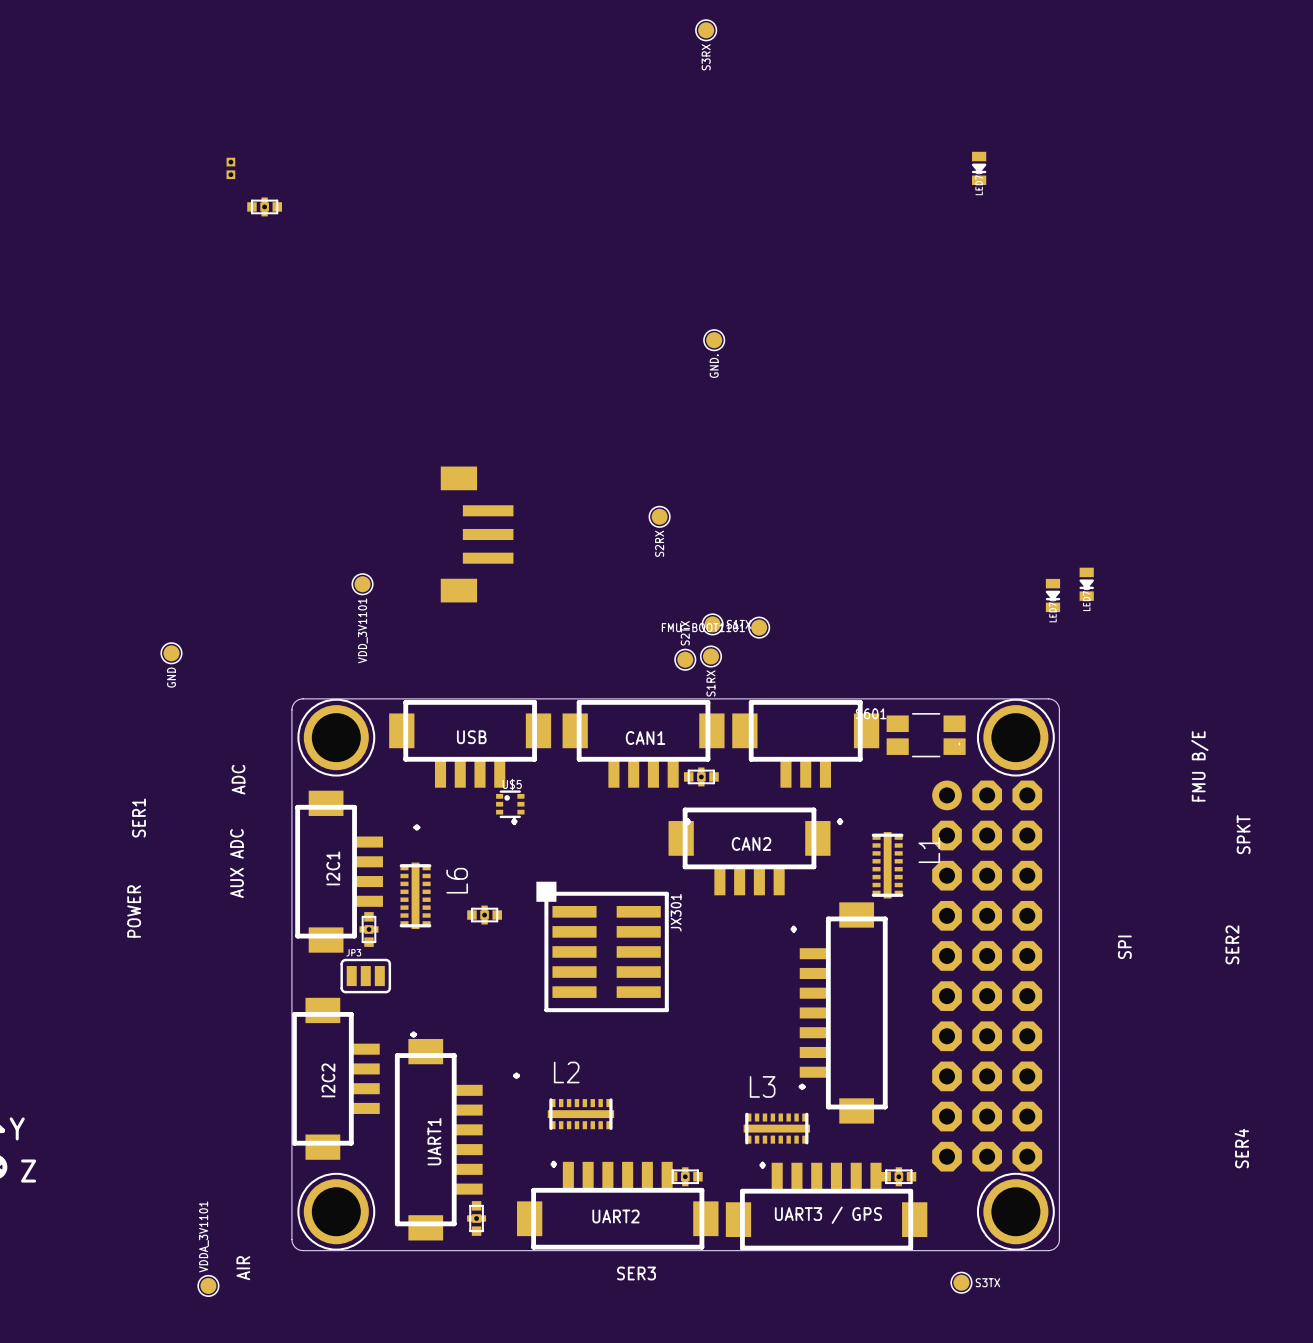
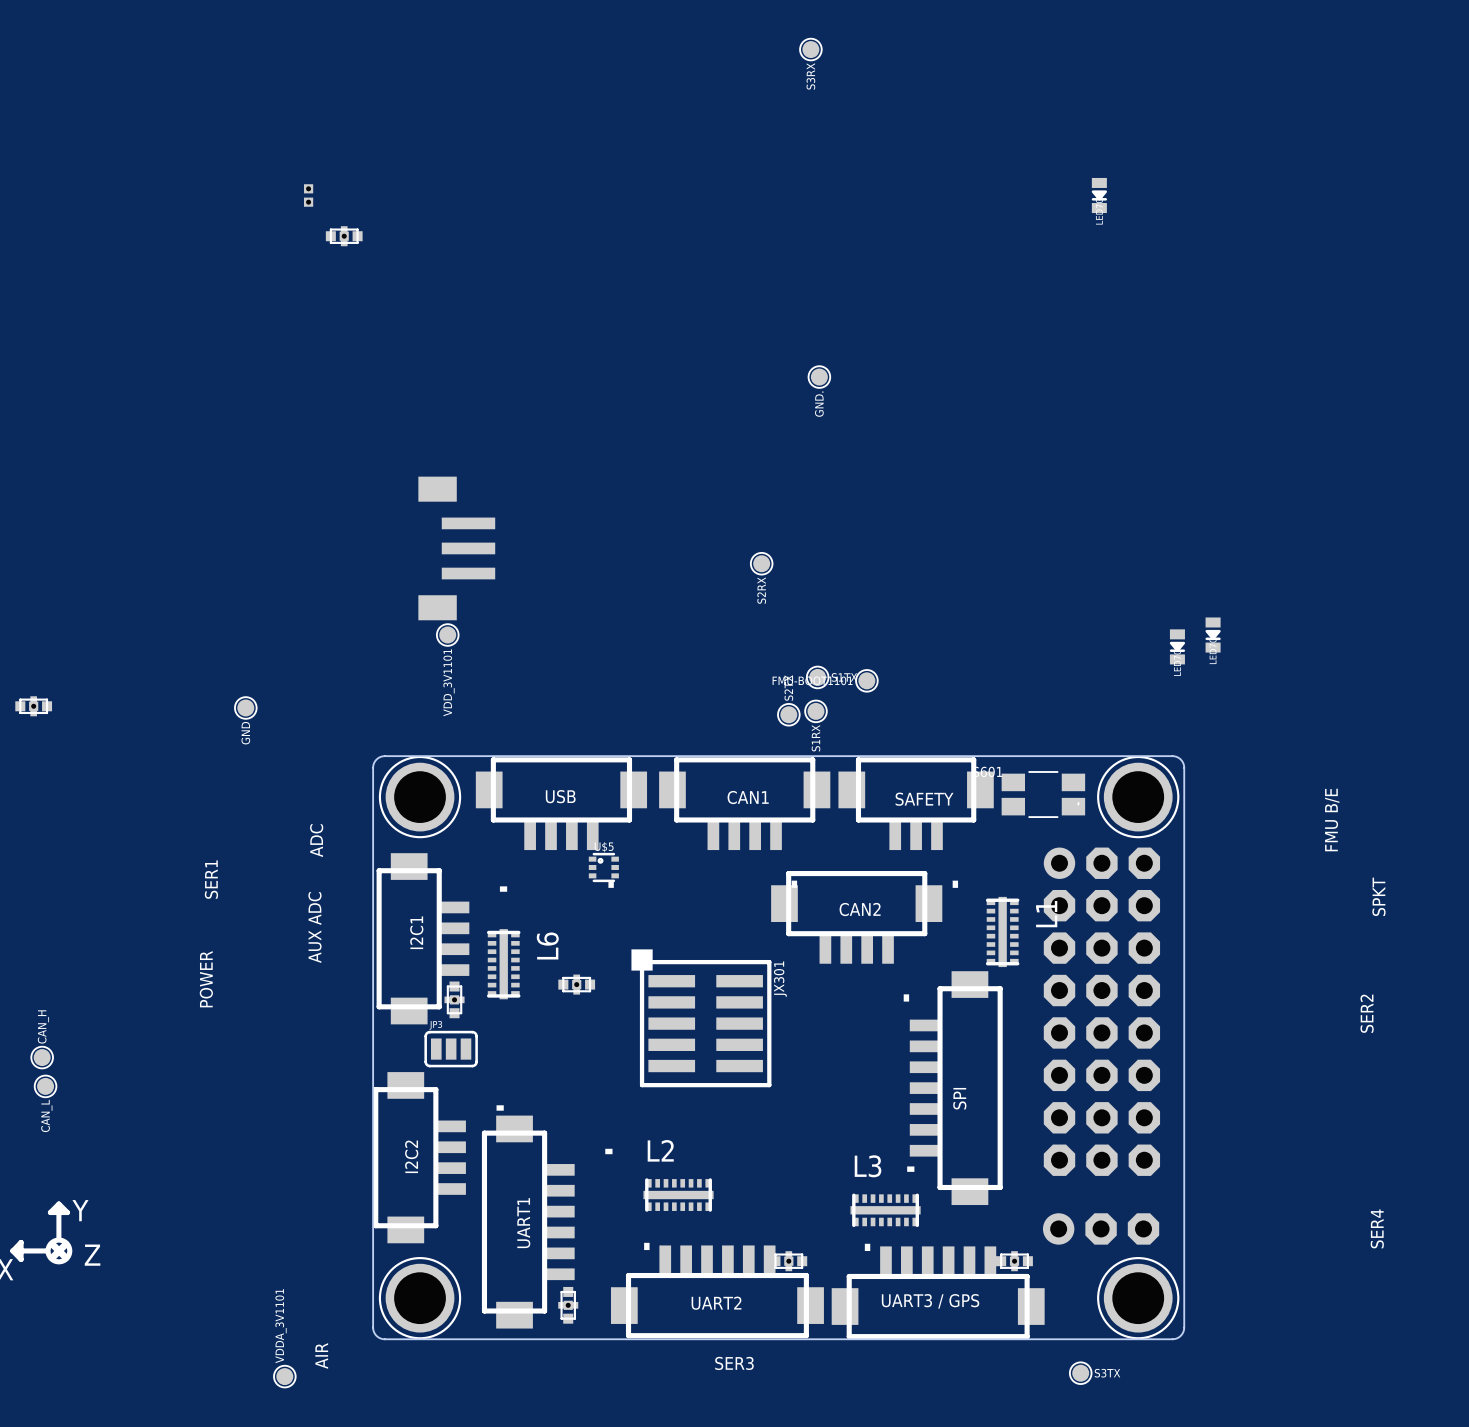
part position: (477, 534) -> (456, 548)
text: none -> SAFETY (924, 799)
part: (701, 776) -> none
part: none -> (1101, 1011)
text position: SPI (1124, 947) -> SPI (959, 1098)
part: (987, 976) -> none
part: none -> (1101, 1228)

